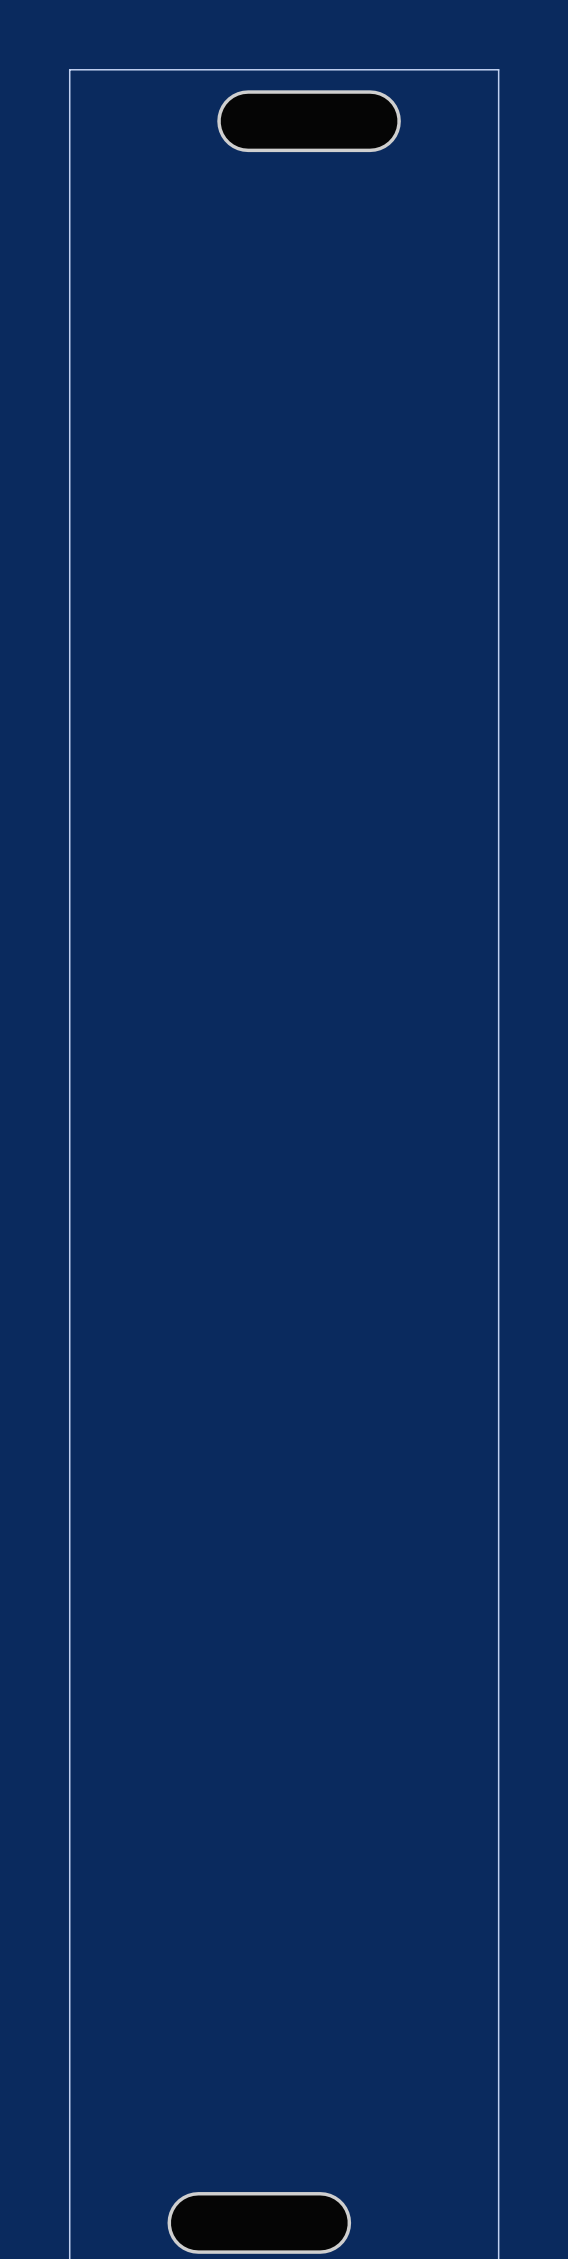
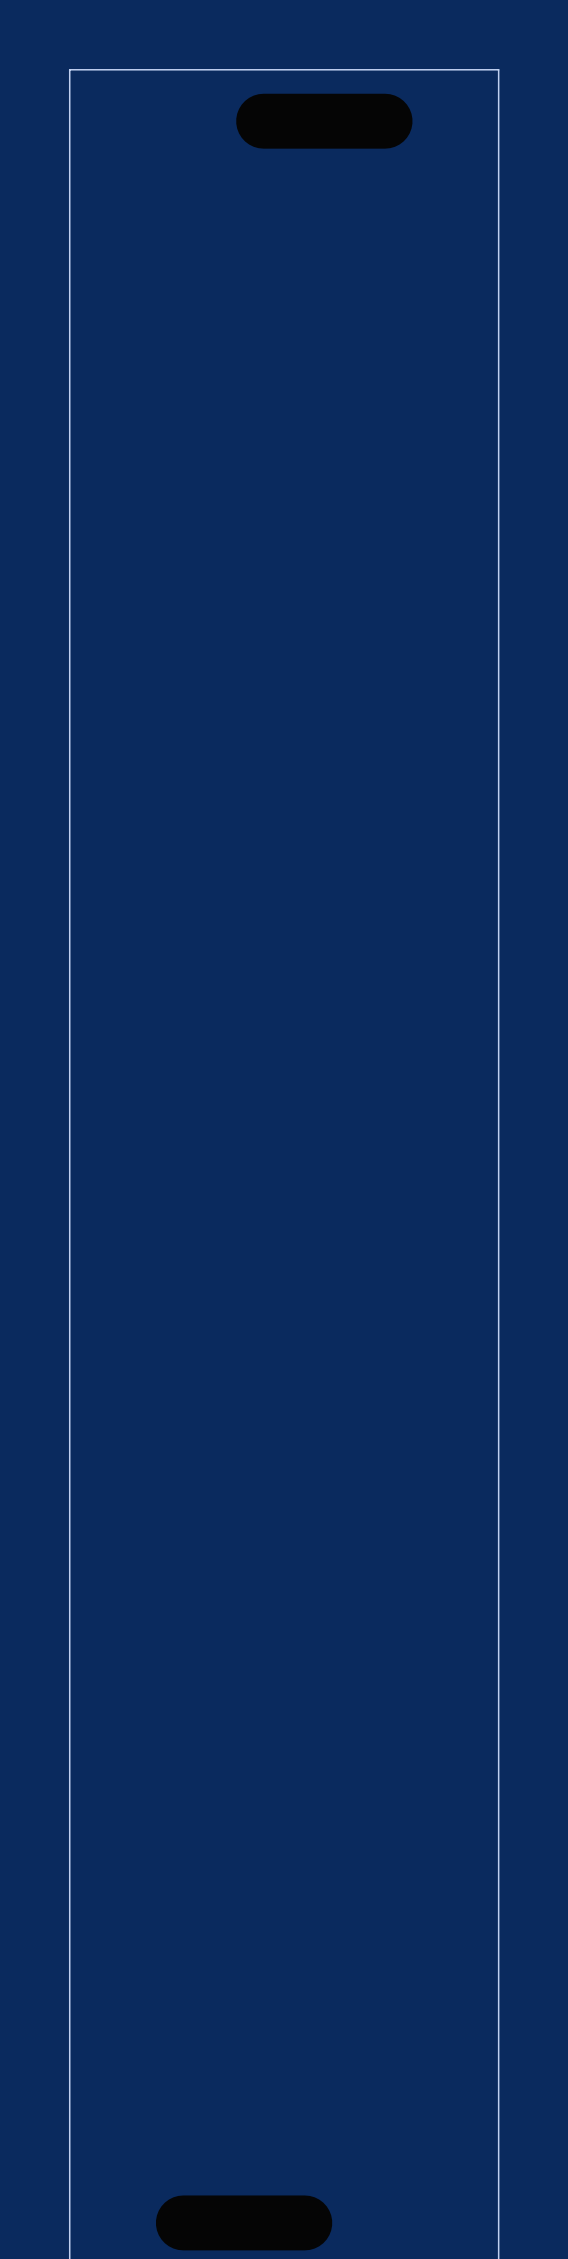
part footprint: [217, 90, 401, 153] -> [236, 93, 413, 149]
part footprint: [167, 2192, 352, 2254] -> [155, 2195, 333, 2251]

